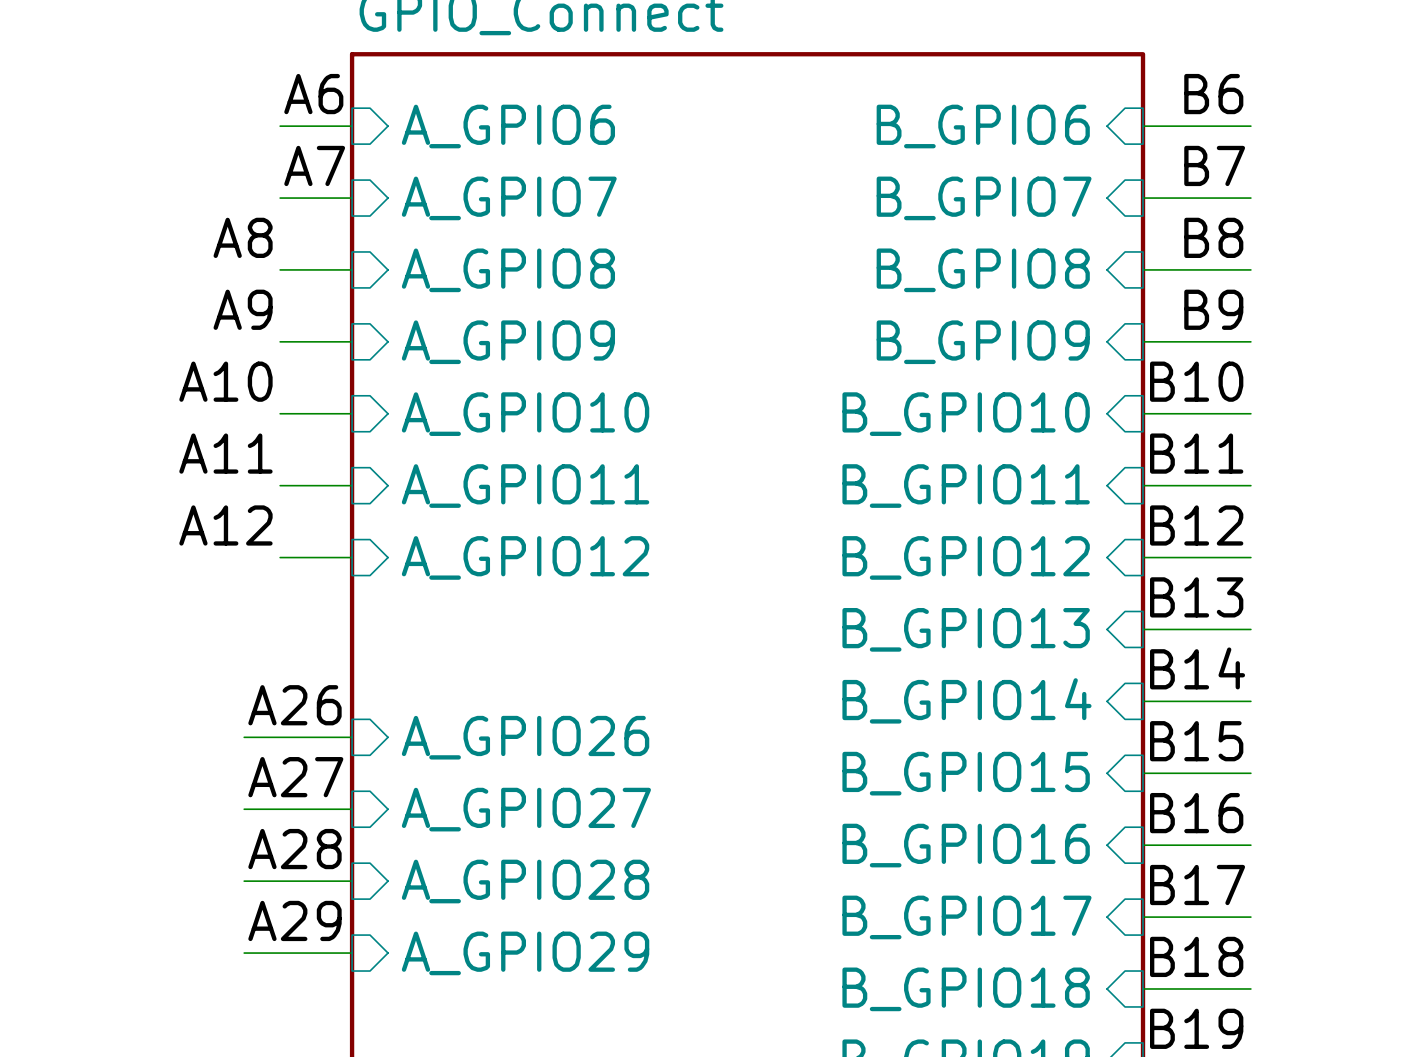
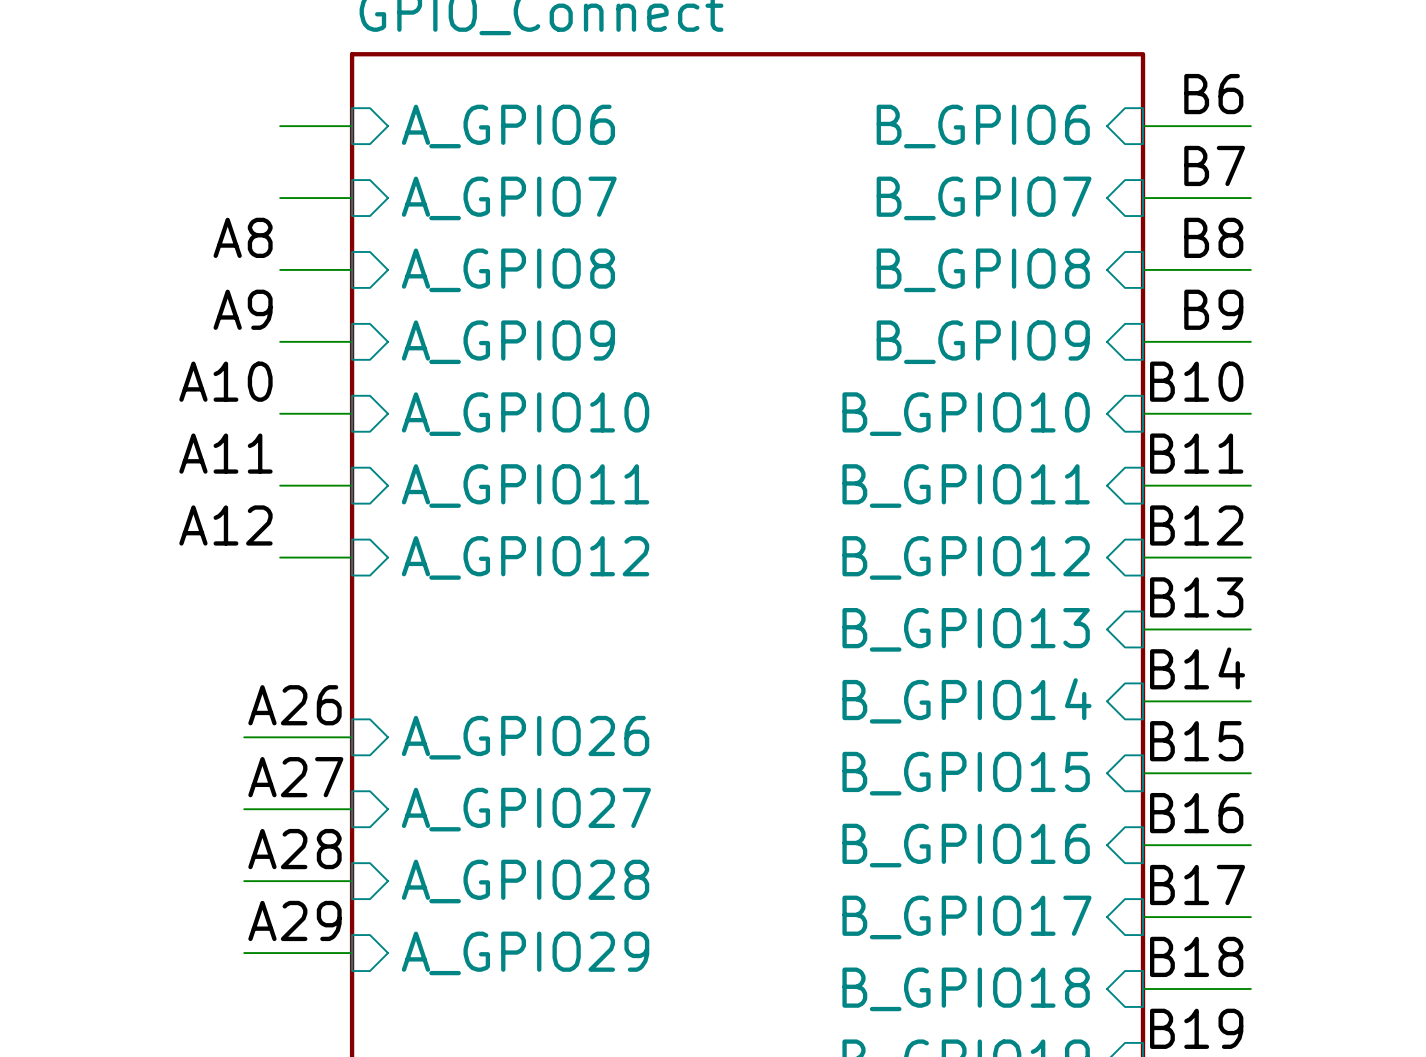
label: A6 (313, 94) -> none
label: A7 (314, 165) -> none

